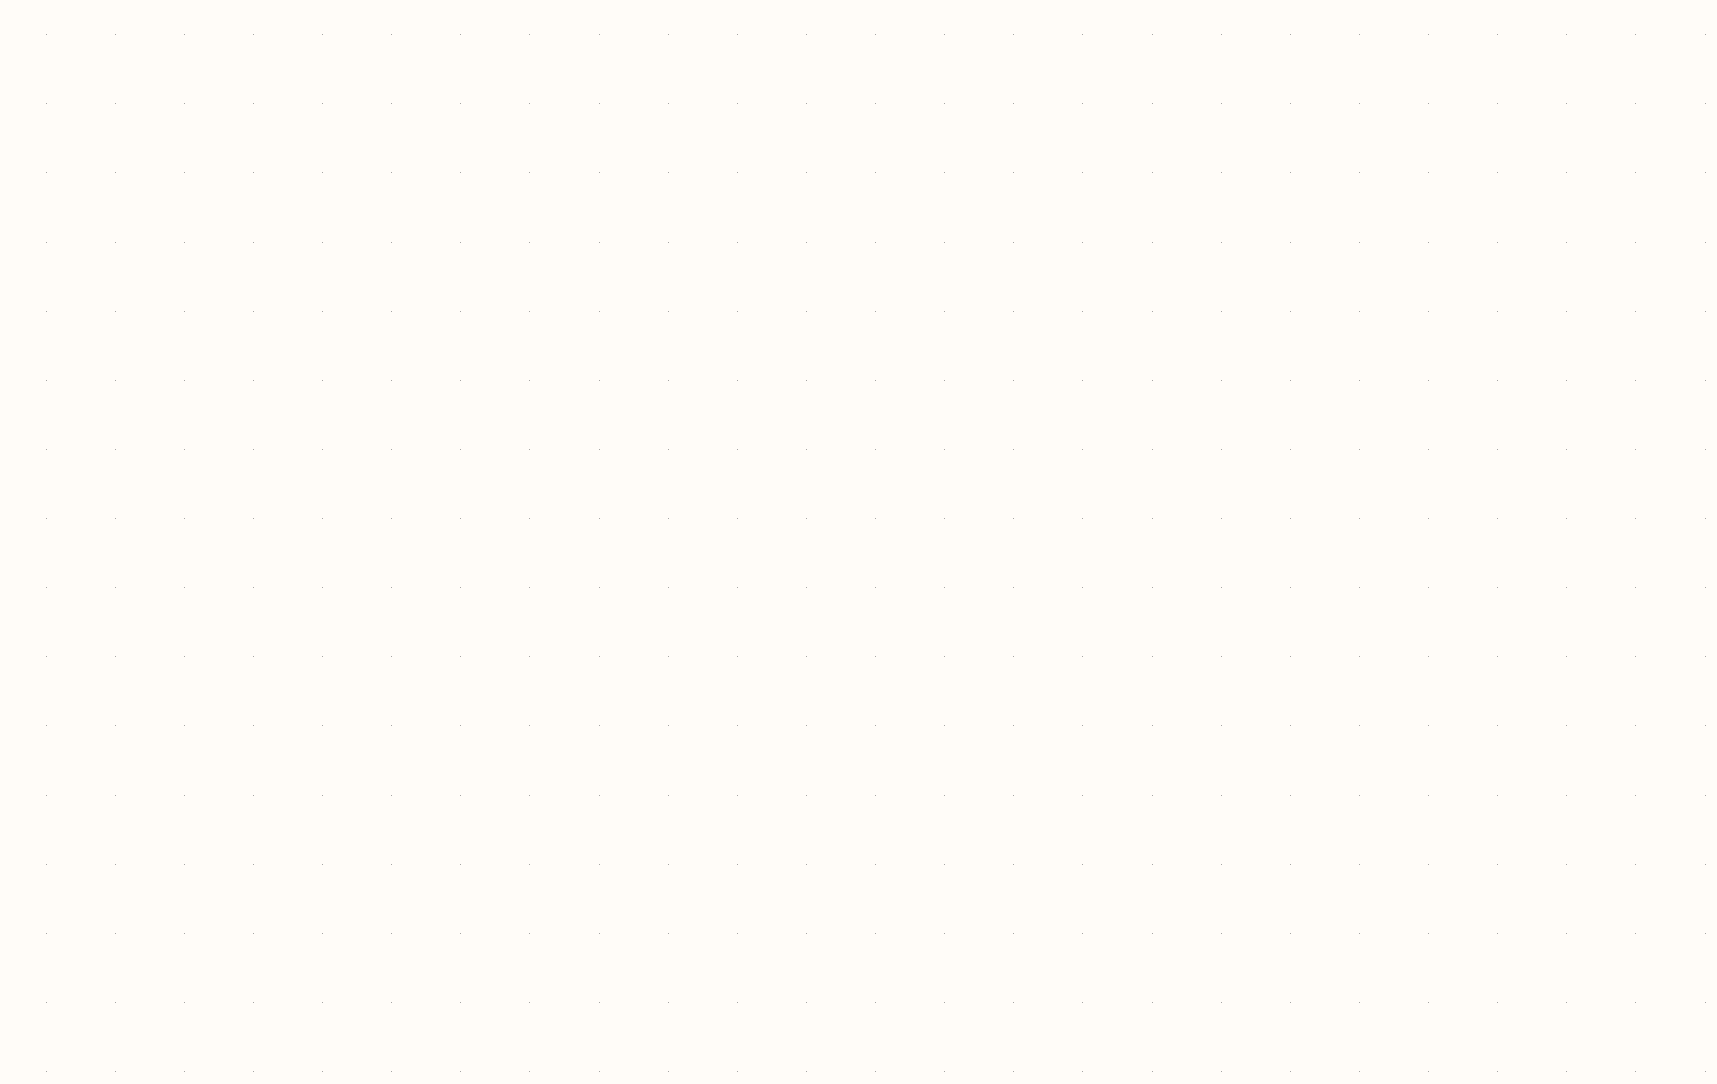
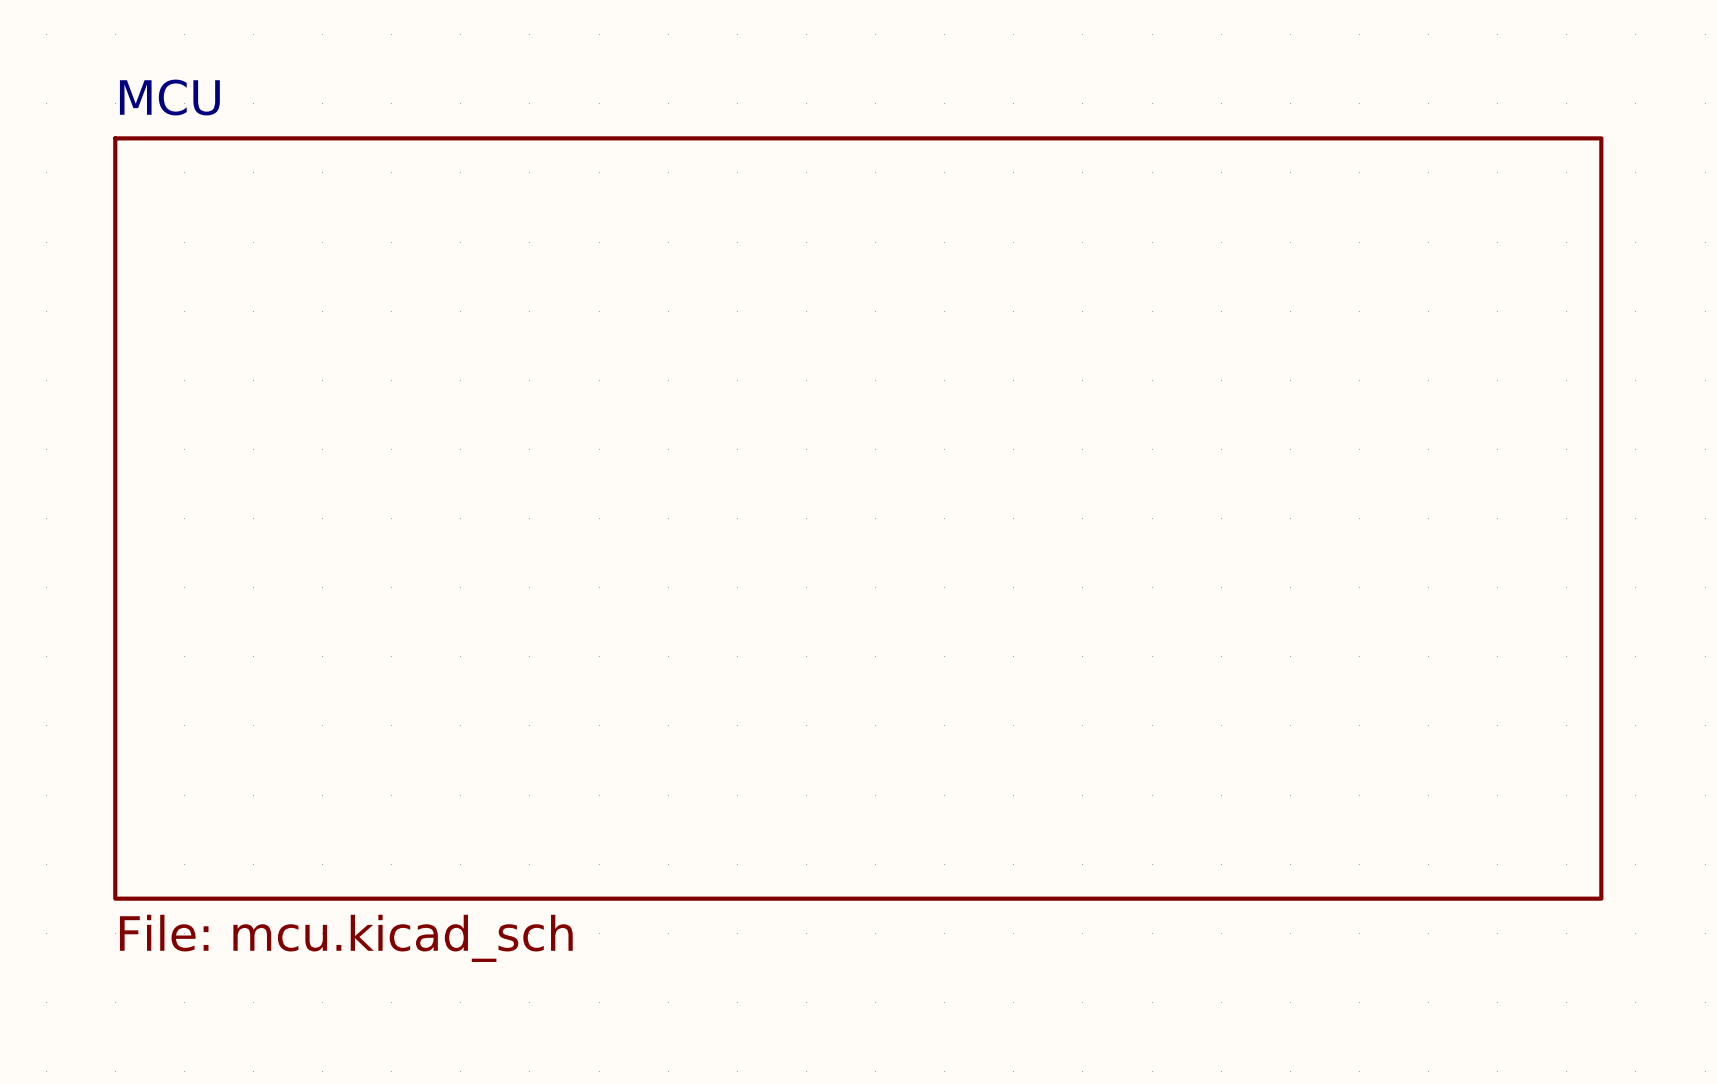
sheet MCU: none -> File: mcu.kicad_sch (858, 518)

